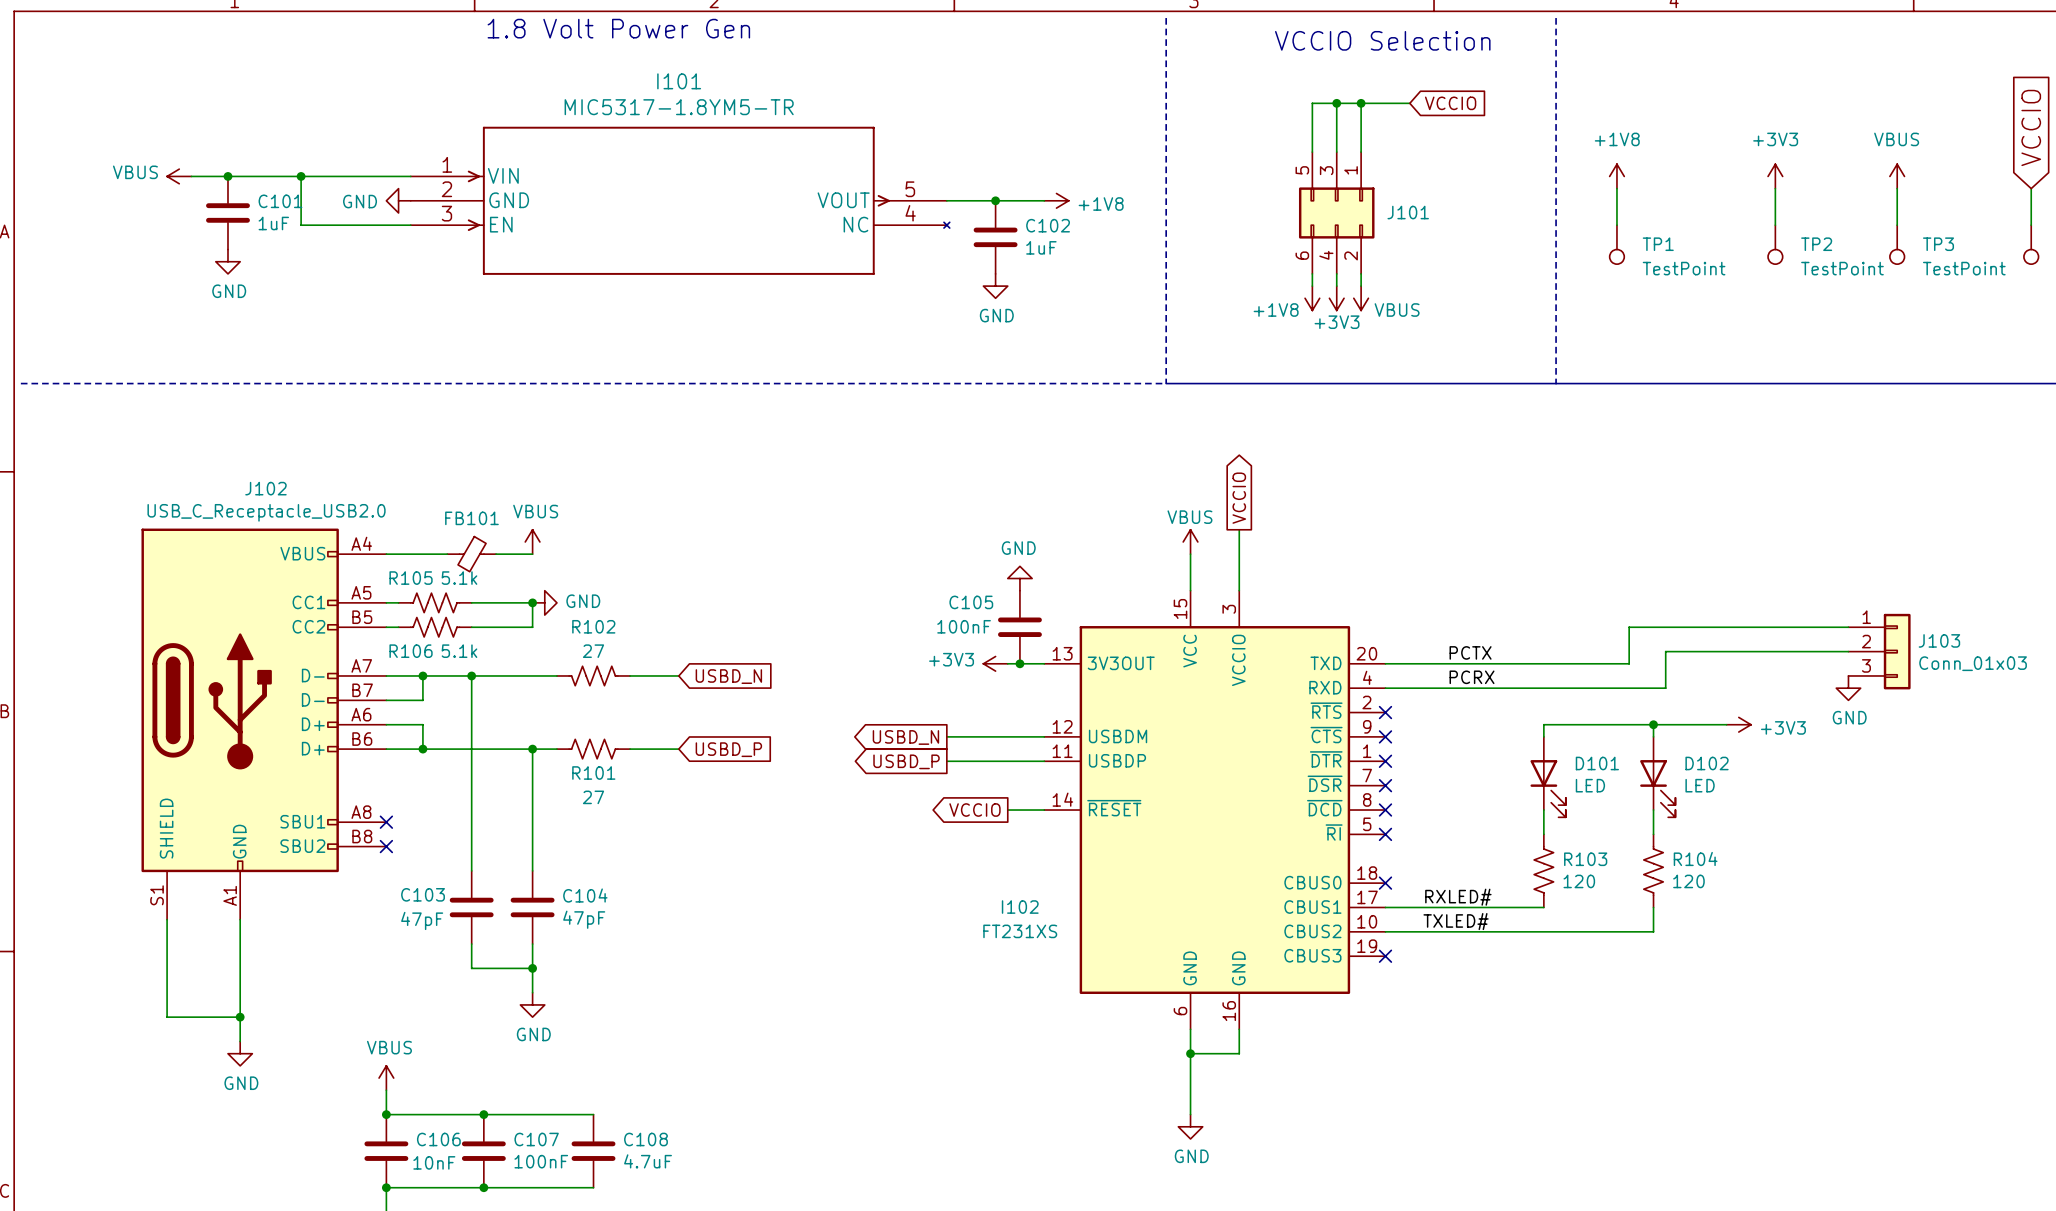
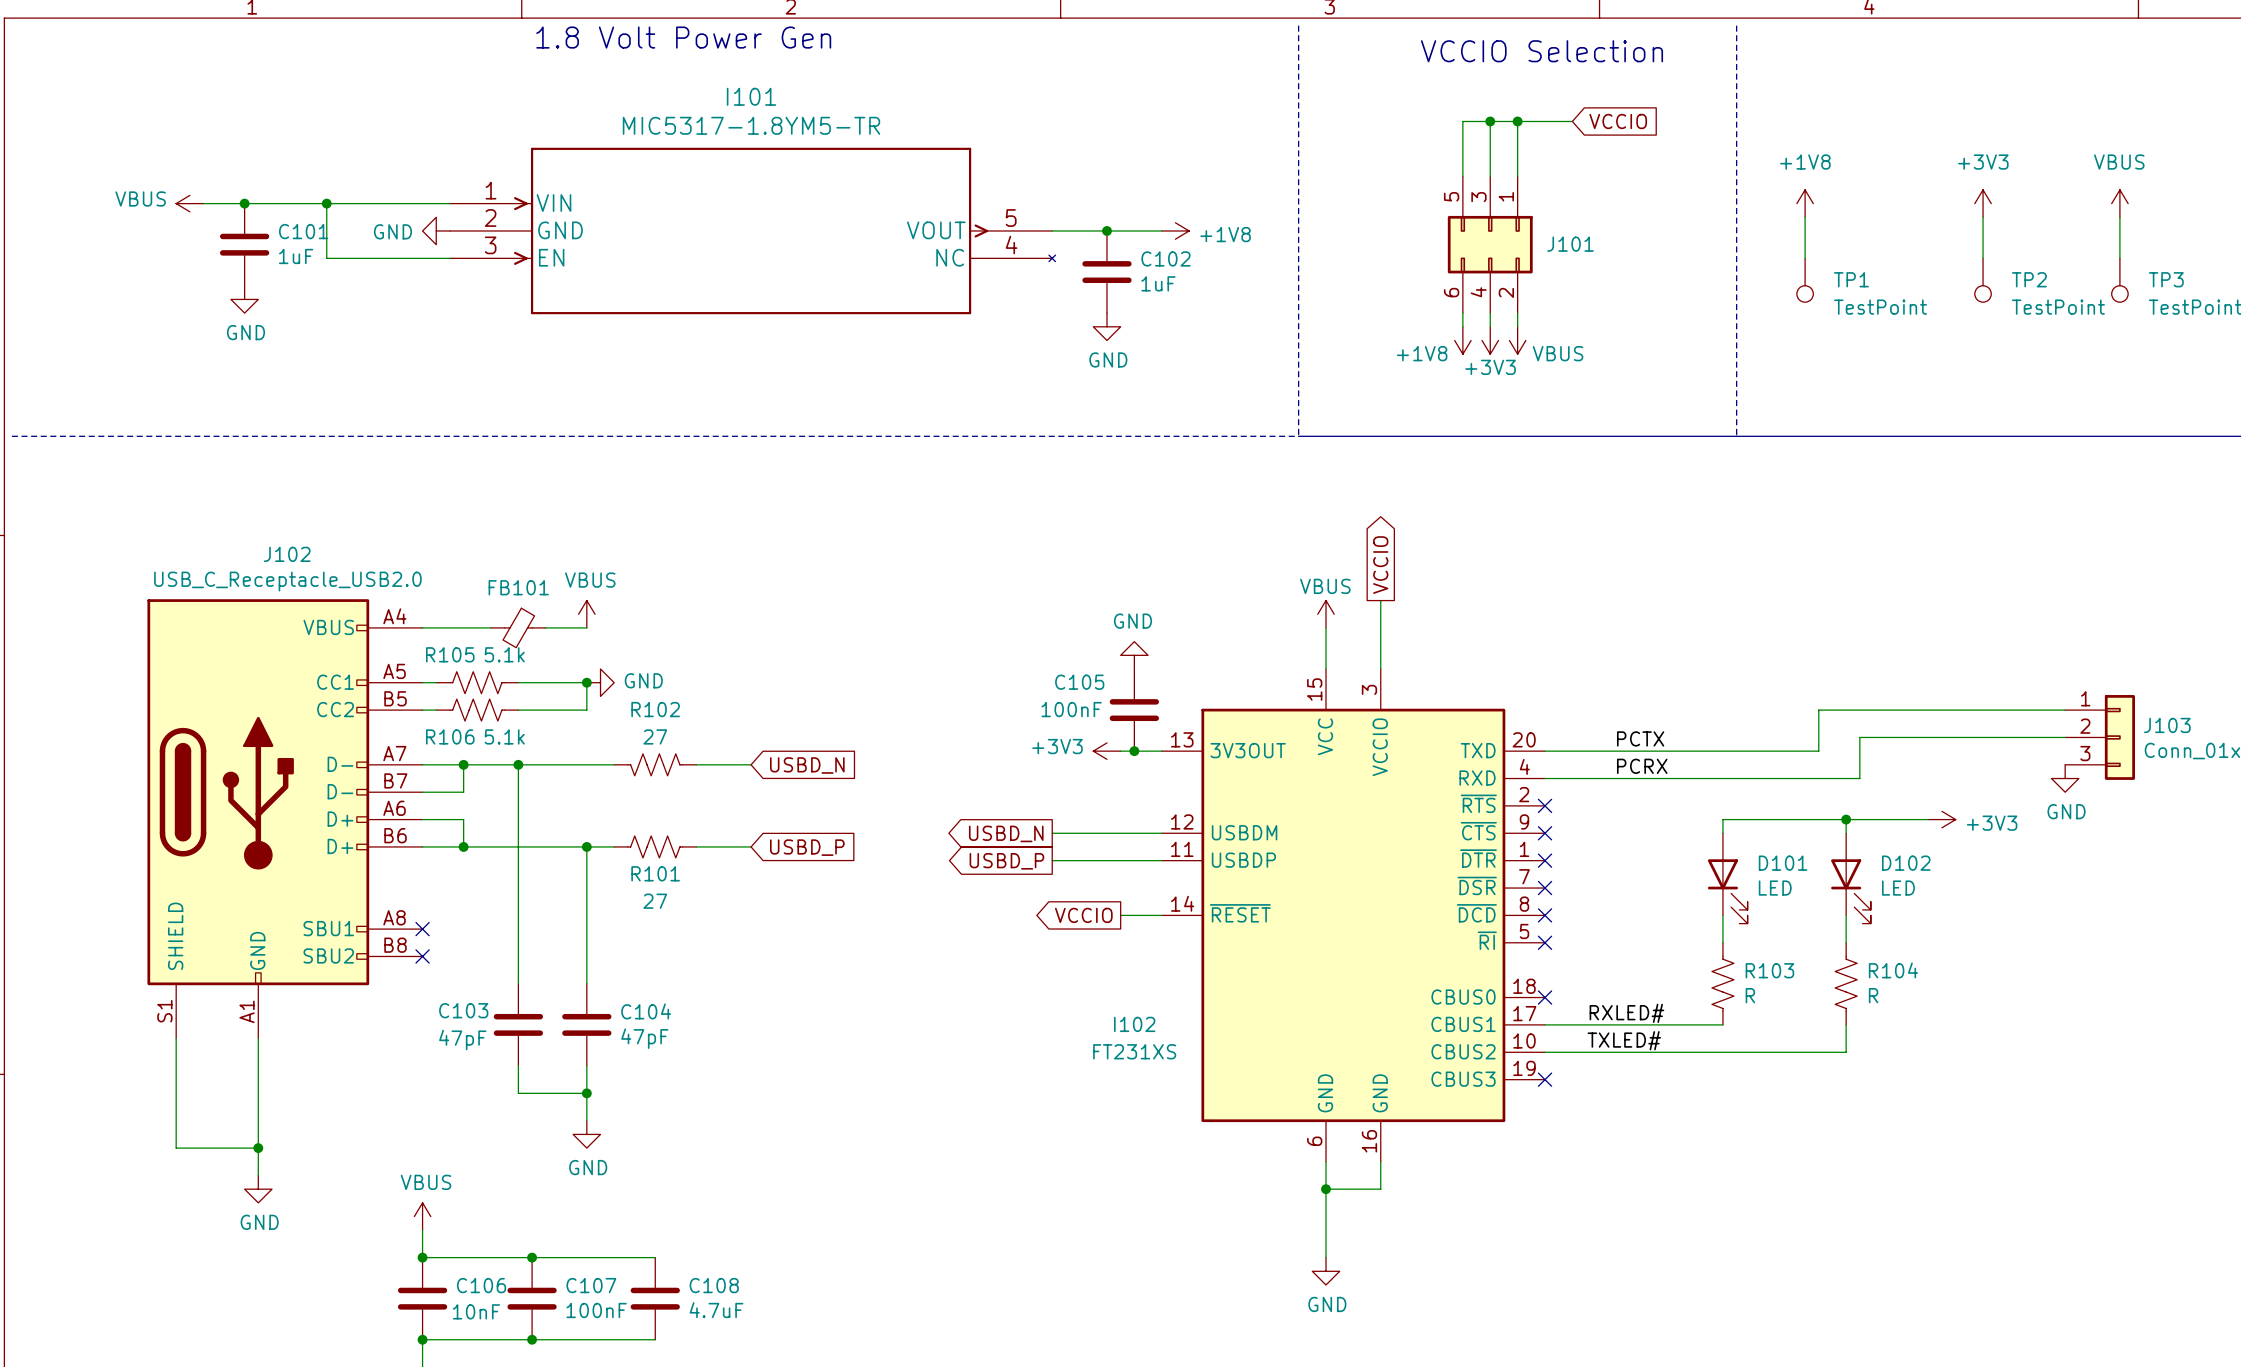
R103 value: 120 (1579, 881) -> R (1750, 995)
R104 value: 120 (1688, 881) -> R (1873, 995)

